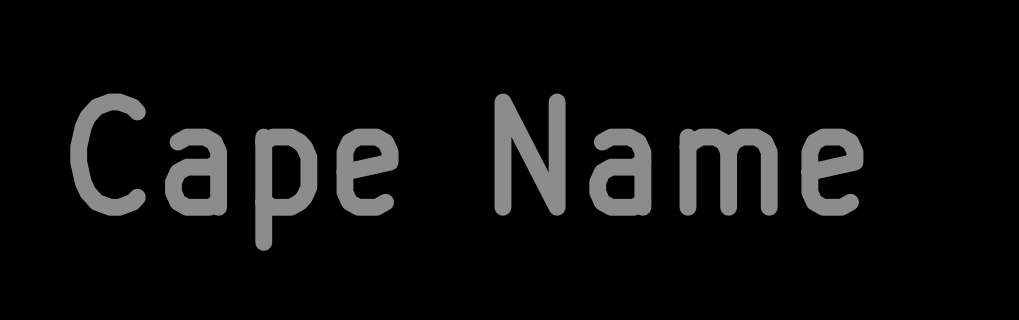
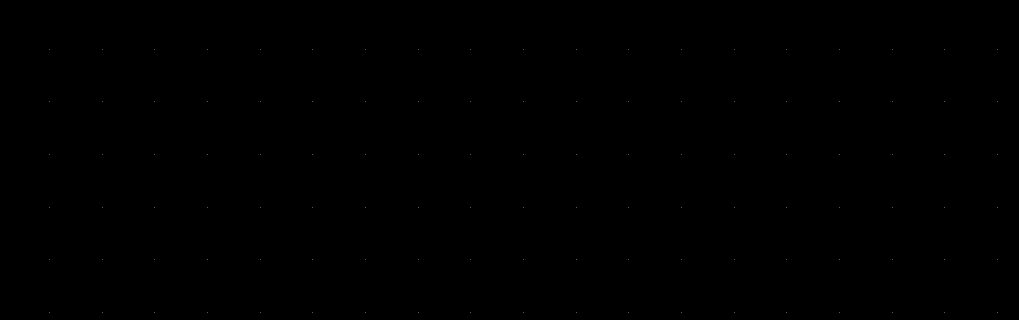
text: Cape Name (466, 172) -> none

